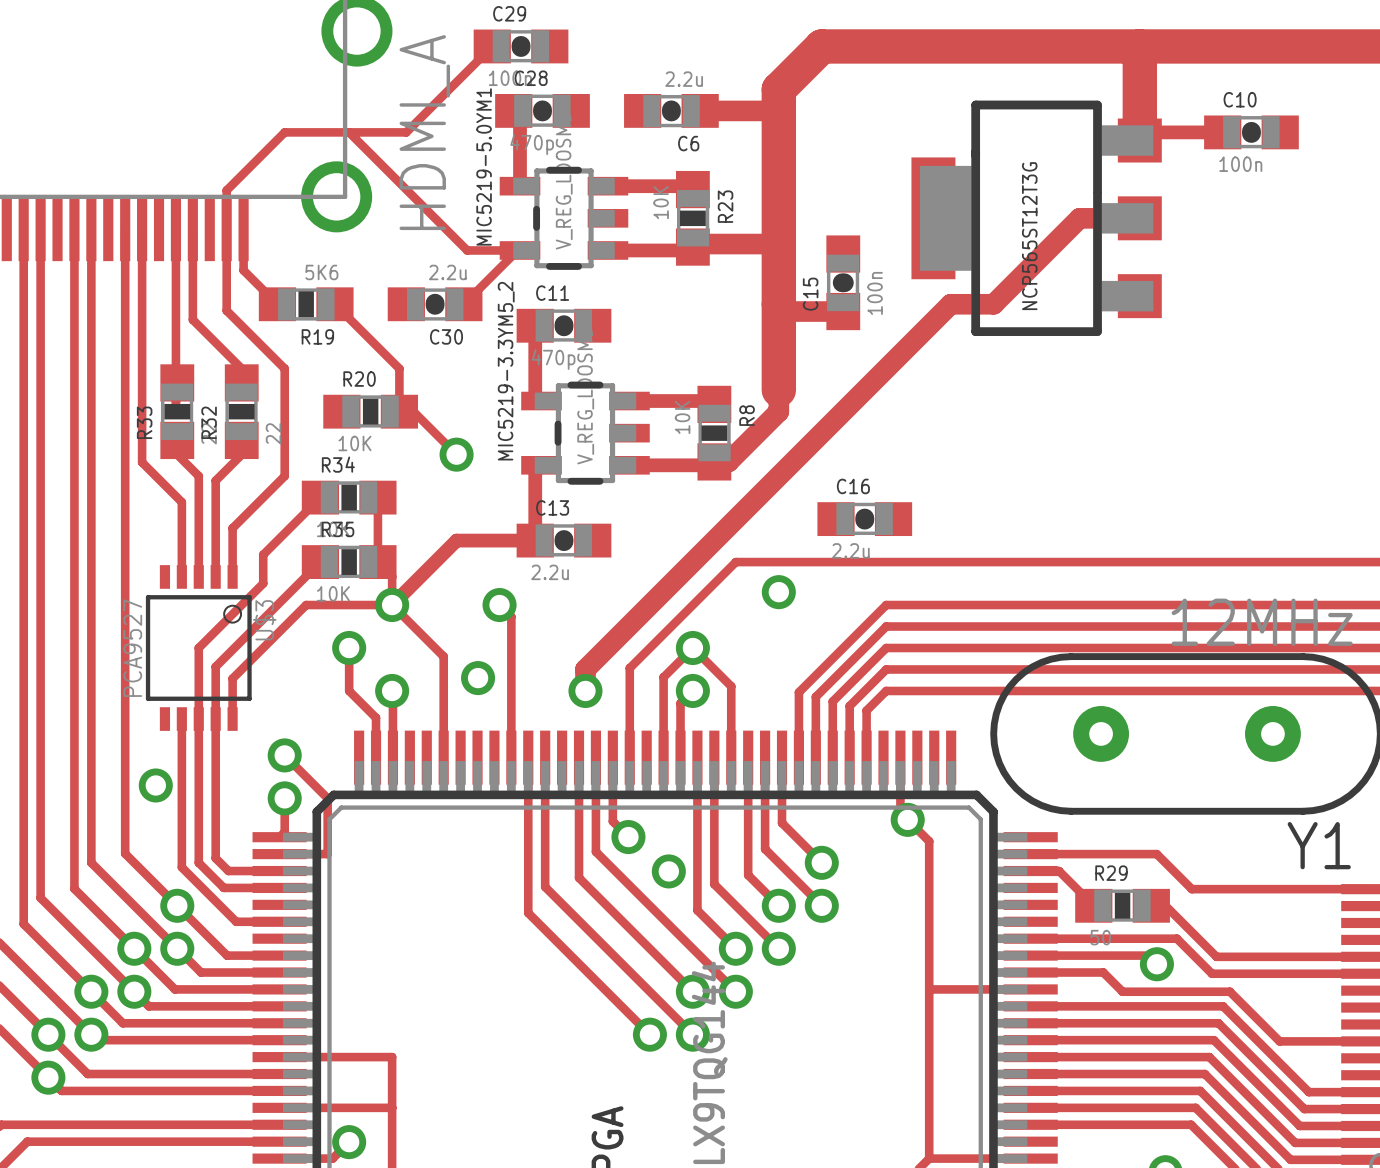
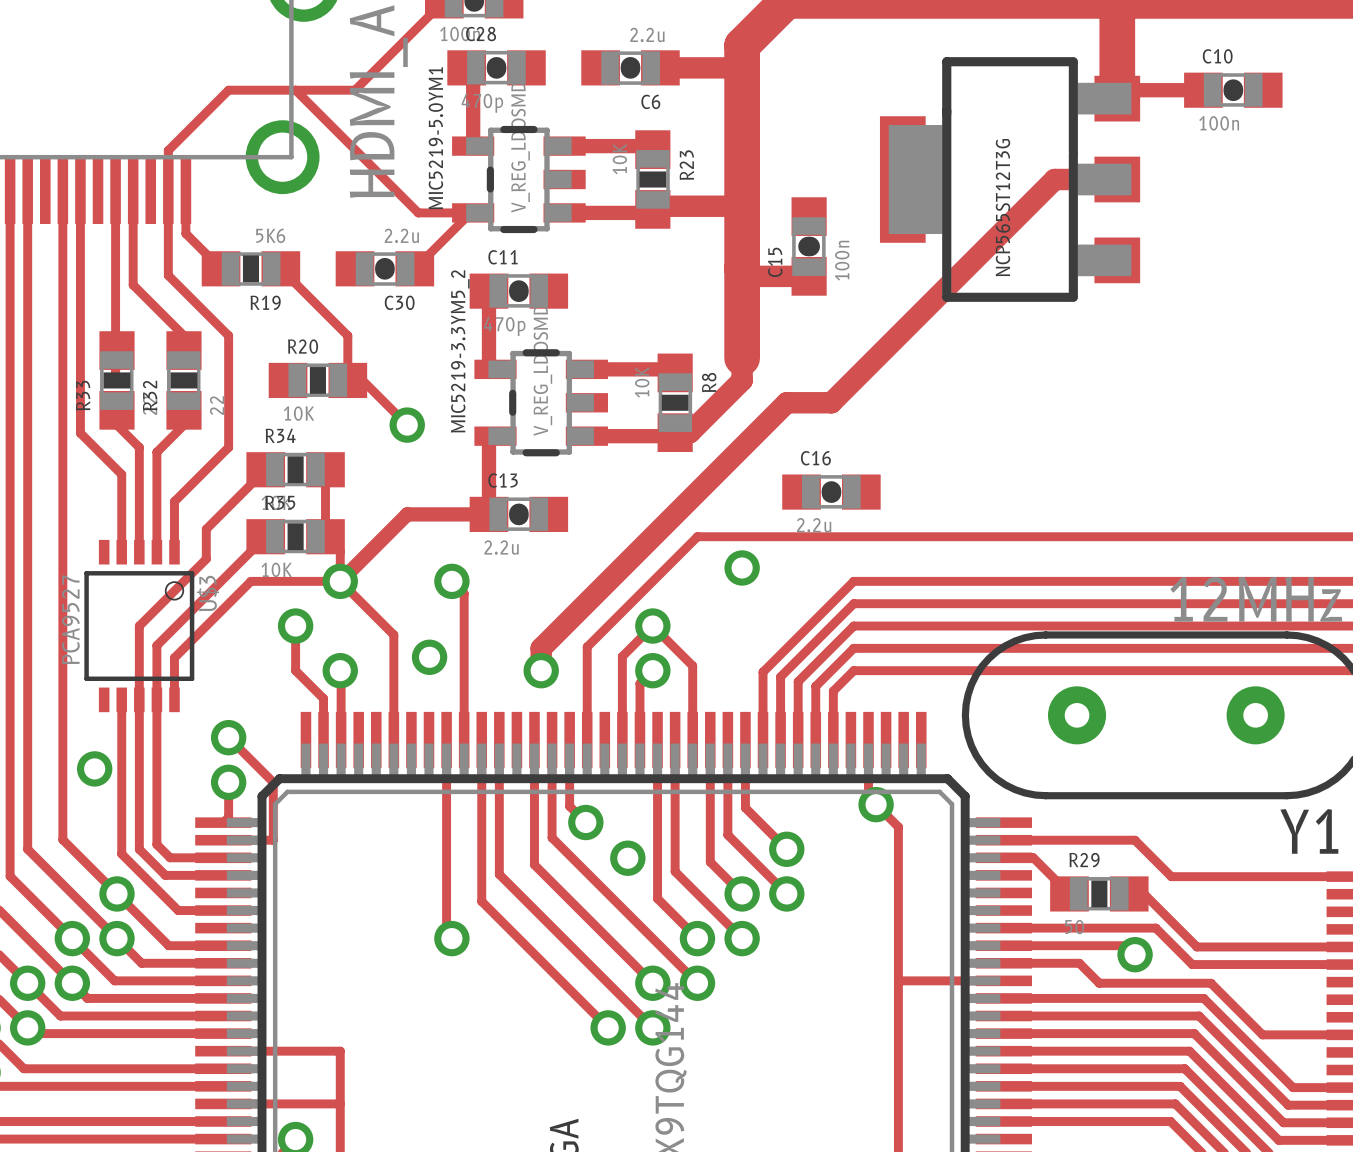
track: (993, 304) (950, 304) (821, 433) -> (965, 268) (831, 402) (786, 402)
track: none -> (446, 740) (446, 933) (451, 938)
via: none -> (451, 938)

